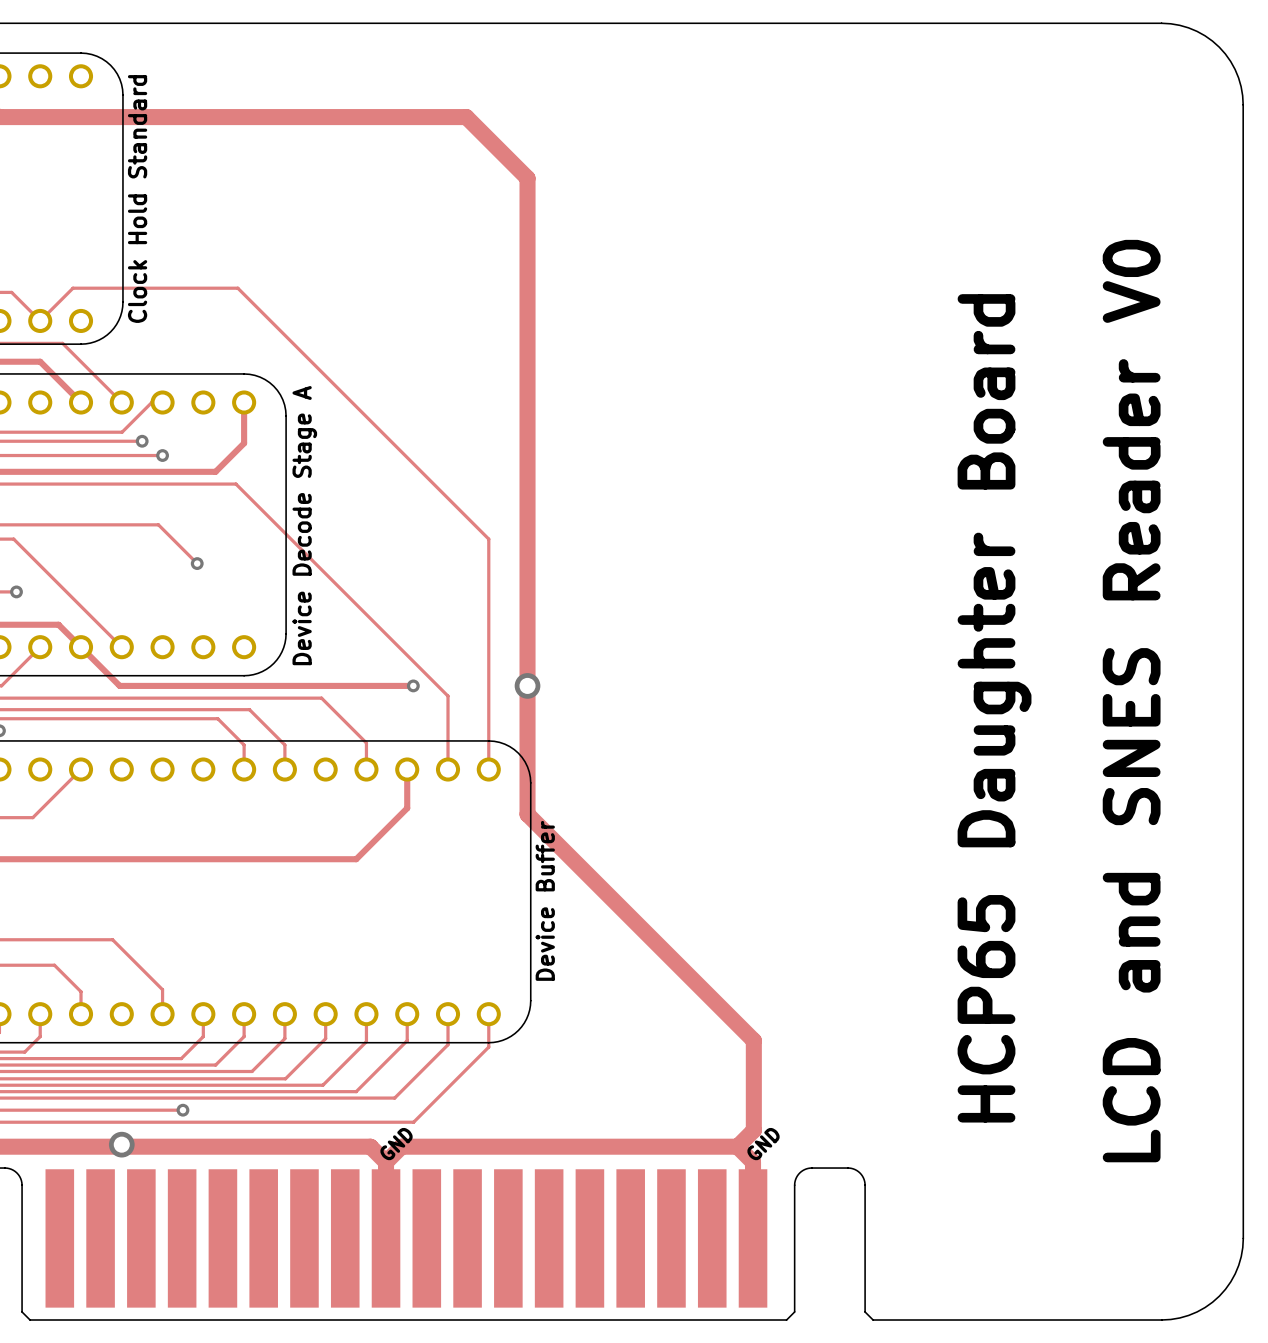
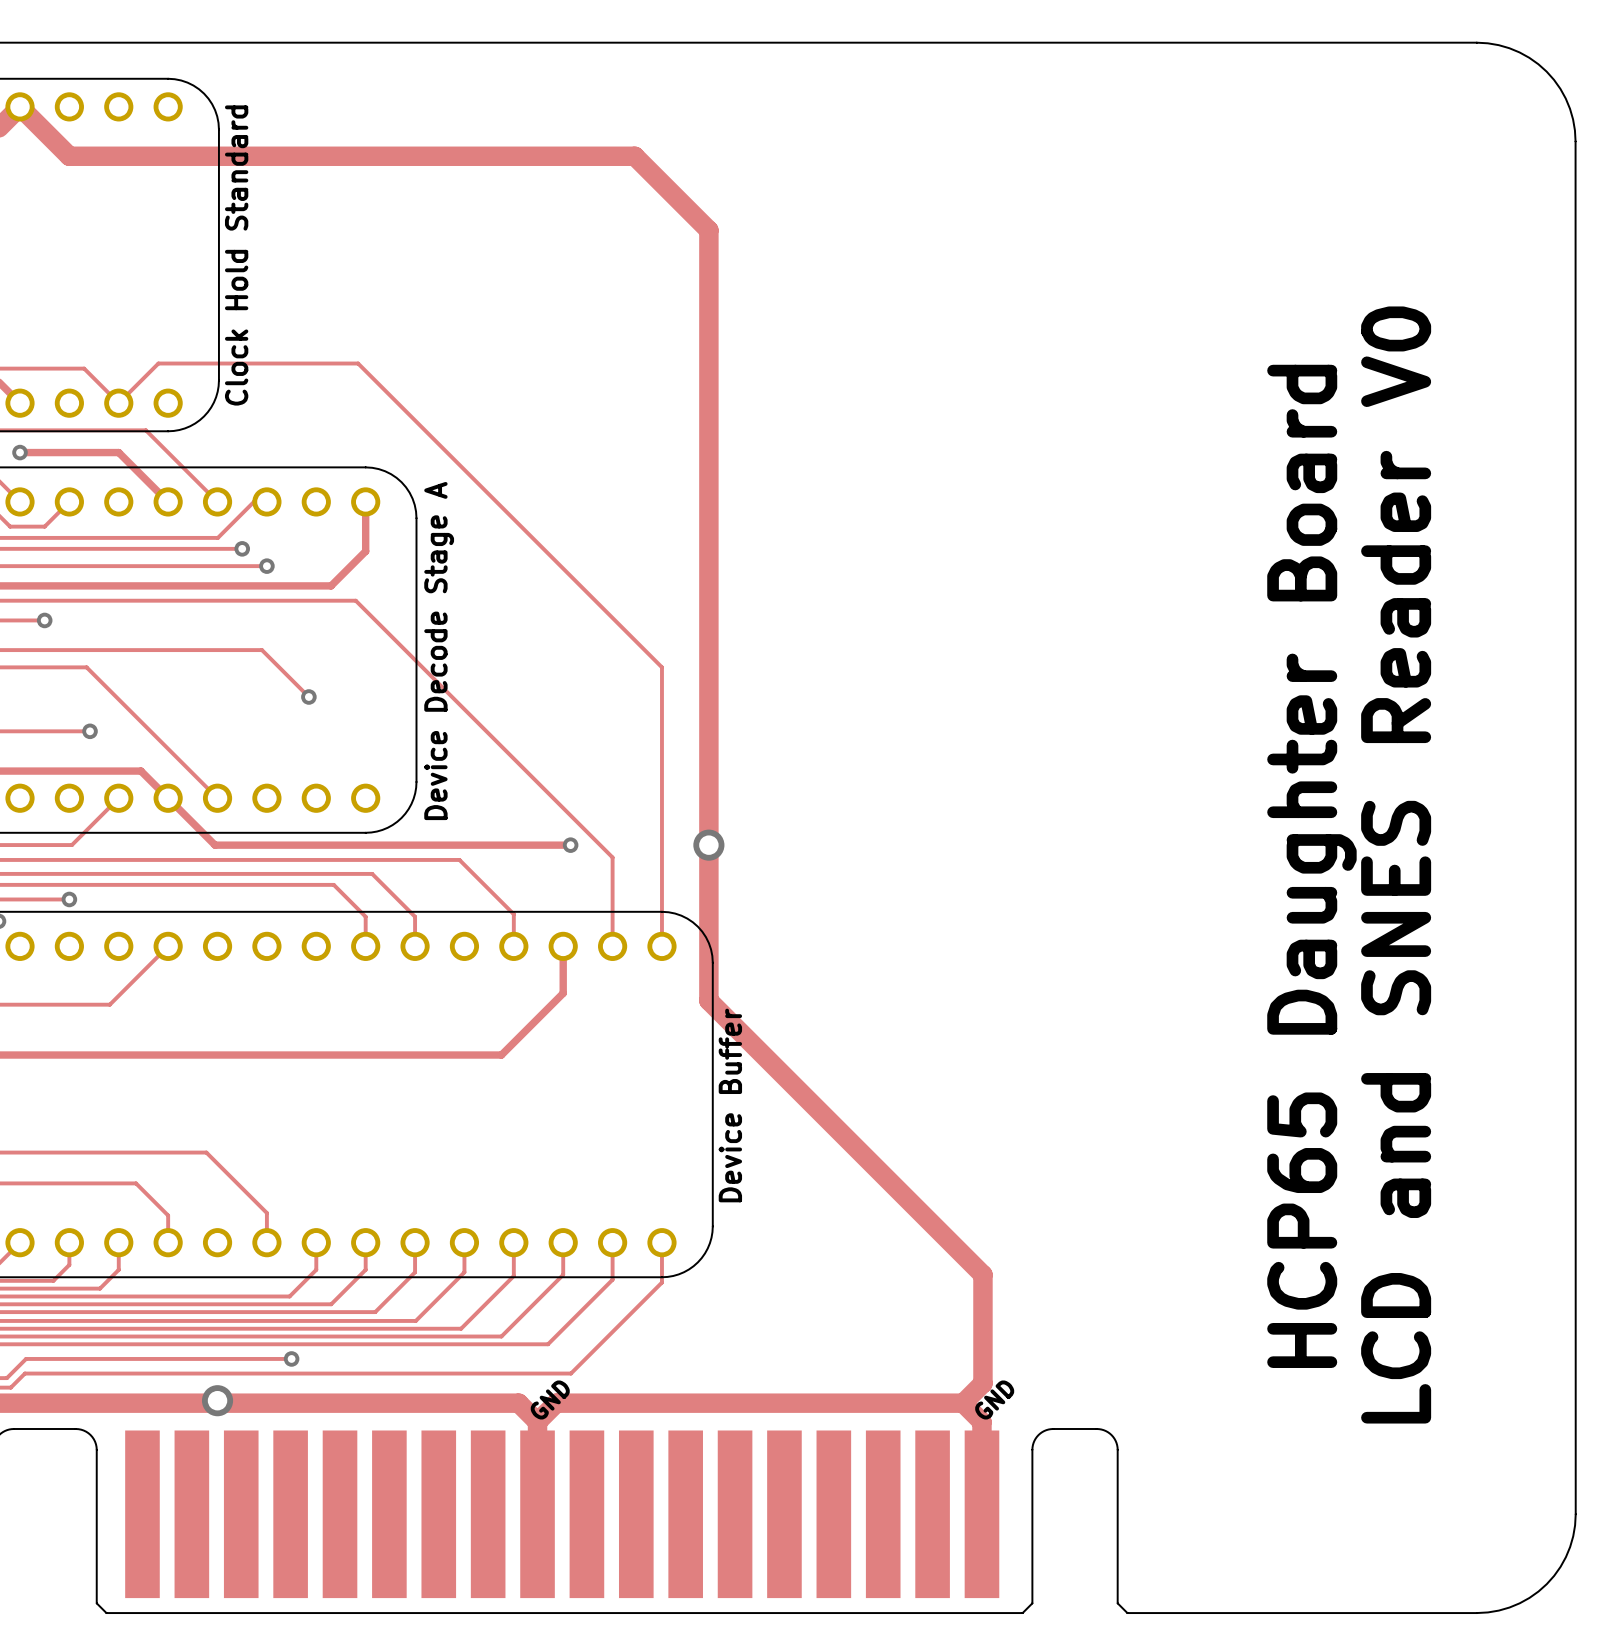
text position: LCD and SNES Reader V0 (1131, 701) -> LCD and SNES Reader V0 (1396, 864)
text position: HCP65 Daughter Board (994, 708) -> HCP65 Daughter Board (1311, 866)

